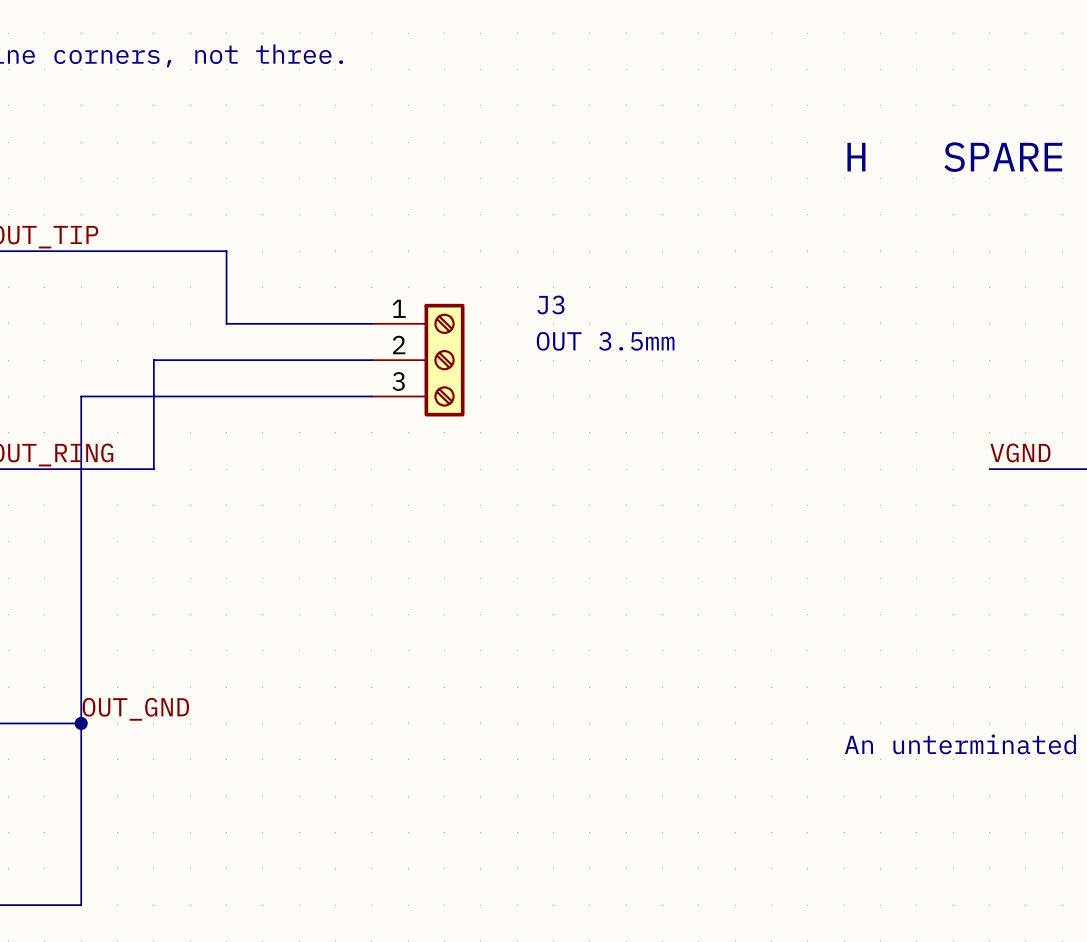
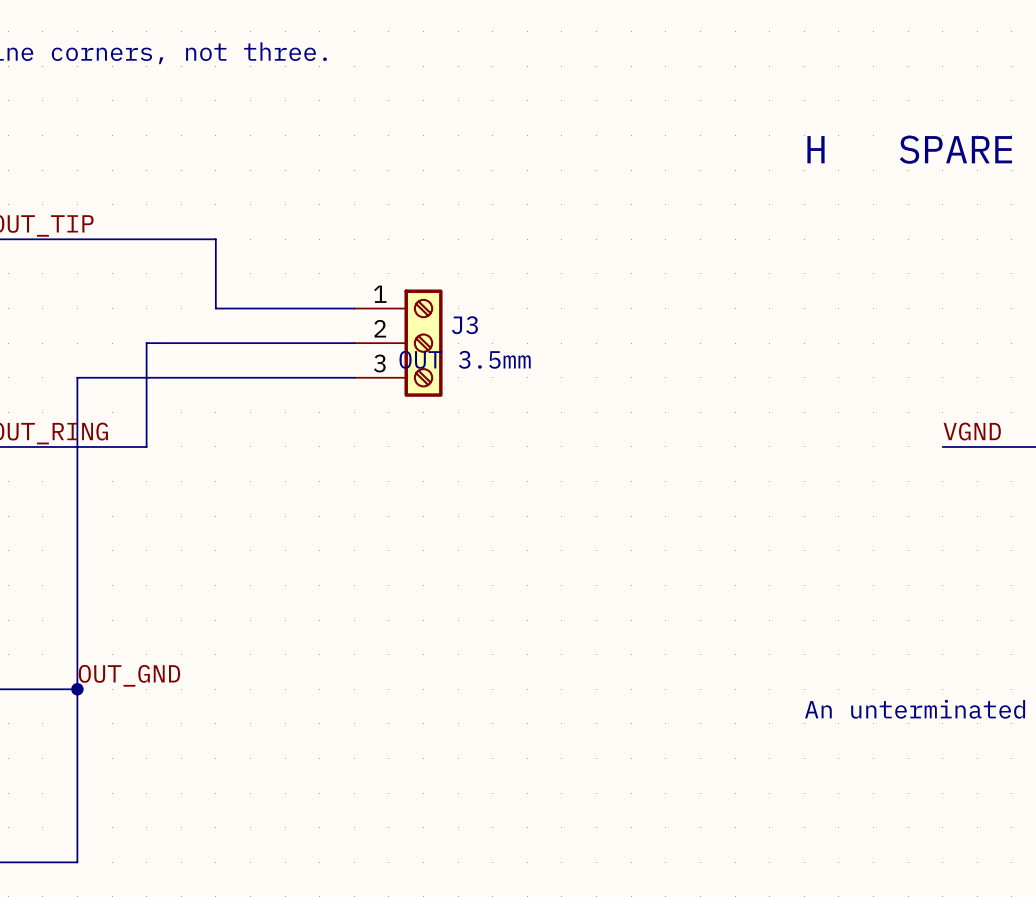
J3 name position: J3 (550, 304) -> J3 (464, 325)
J3 value position: OUT 3.5mm (605, 341) -> OUT 3.5mm (465, 359)

